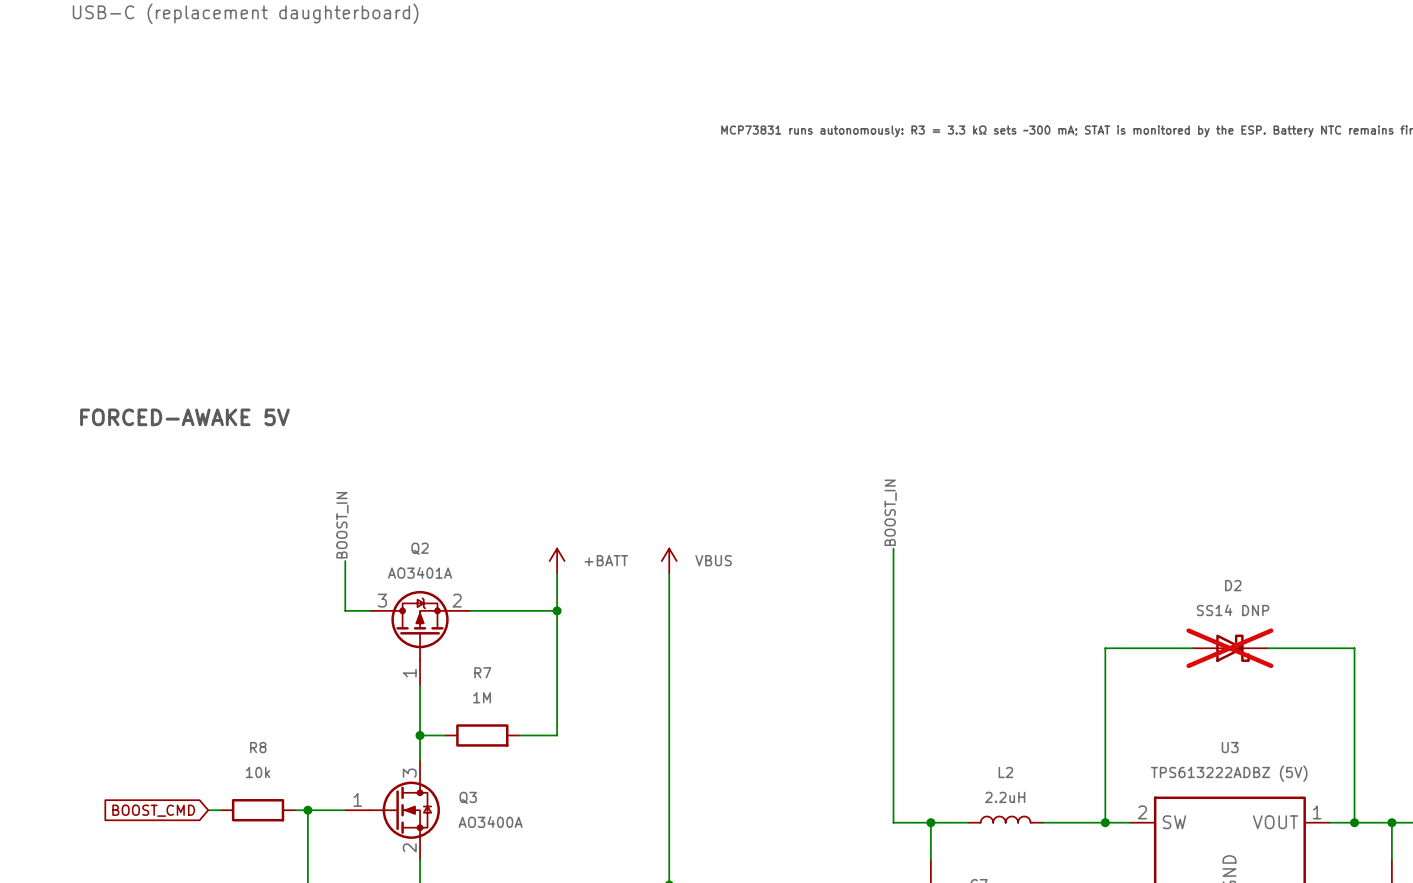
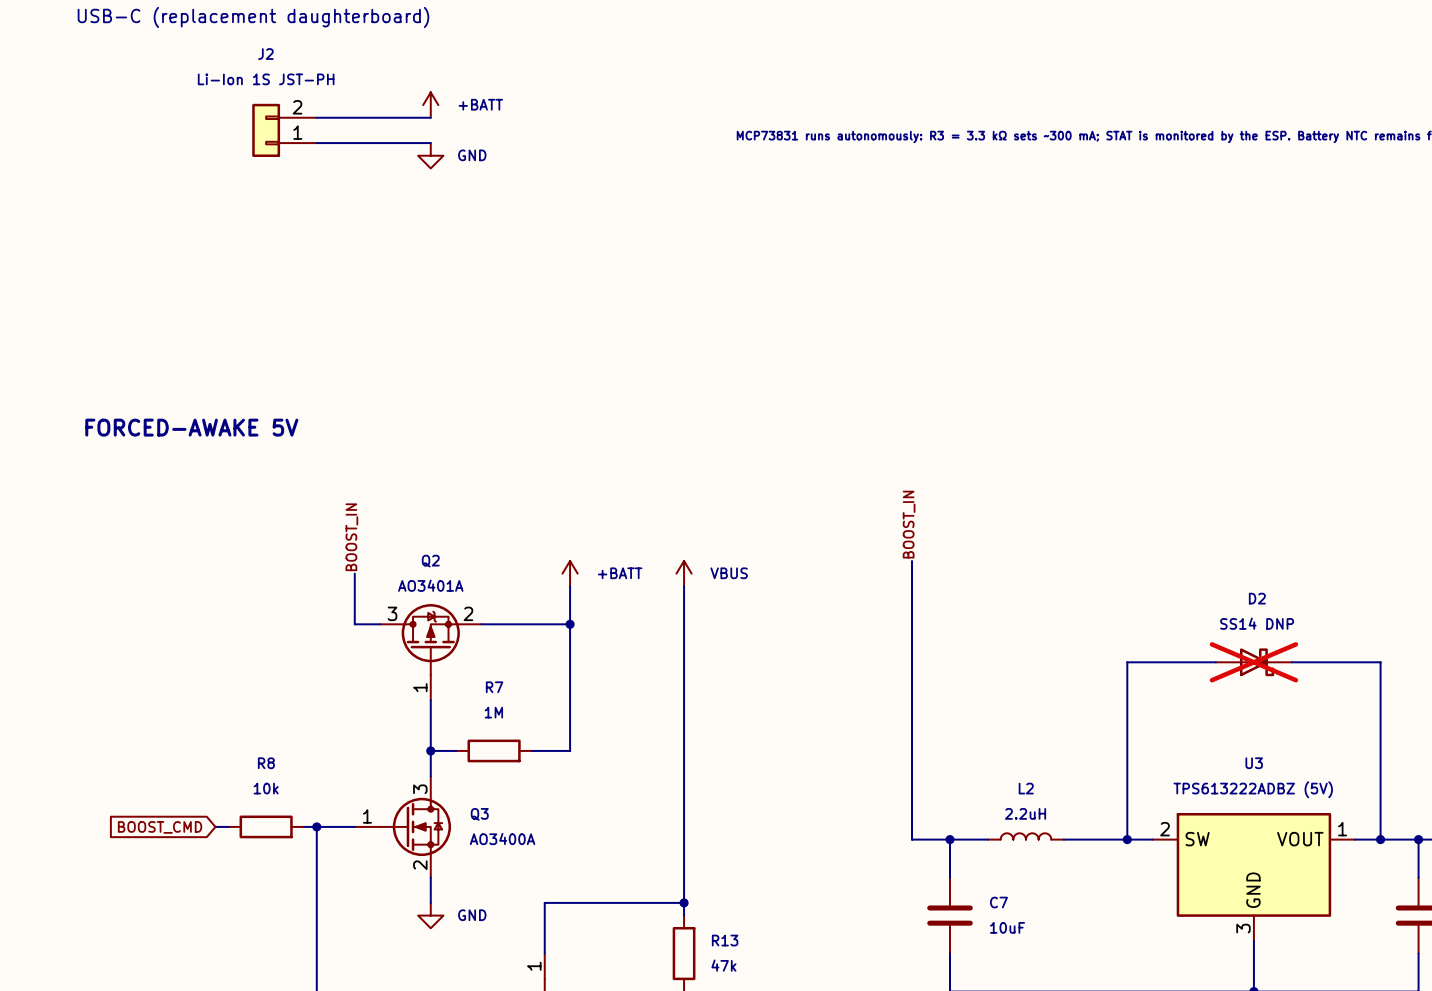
power symbol: none -> +BATT (430, 105)
wire: none -> (316, 117) (430, 117)
J2: none -> Li-Ion 1S JST-PH (284, 130)
wire: none -> (316, 143) (430, 143)
power symbol: none -> GND (430, 155)

